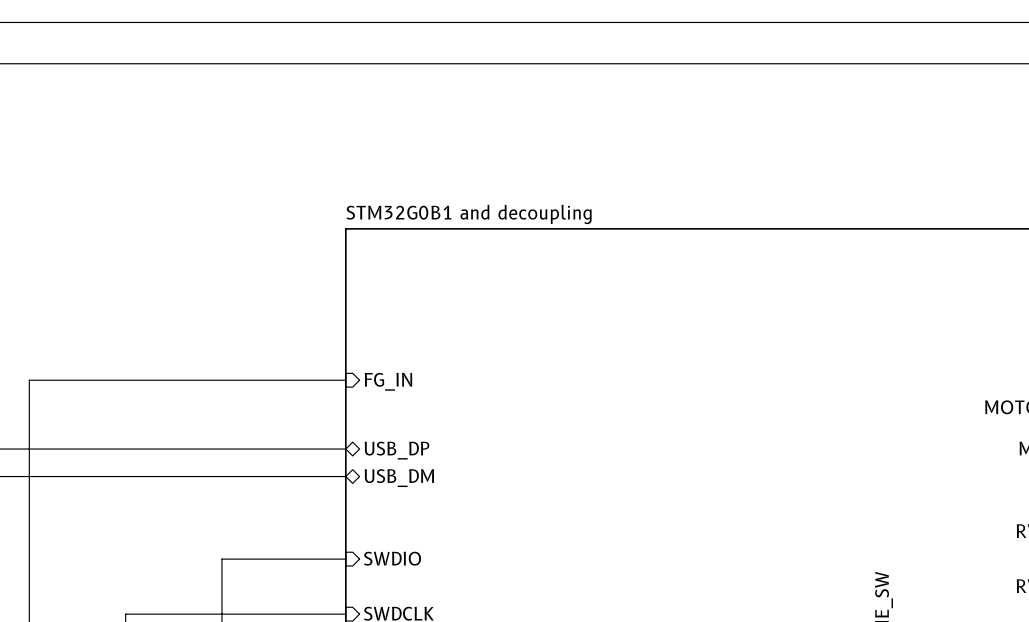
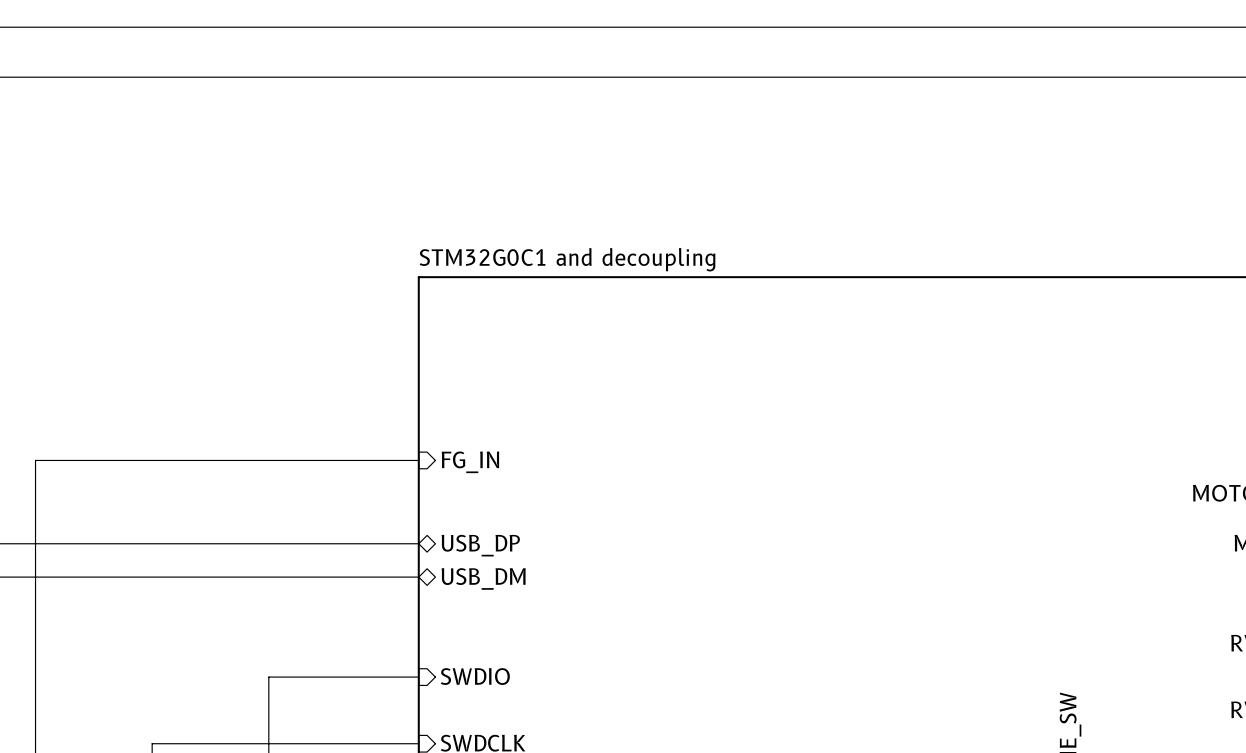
sheet STM32G0B1 and decoupling name: STM32G0B1 and decoupling (469, 214) -> STM32G0C1 and decoupling (567, 259)

